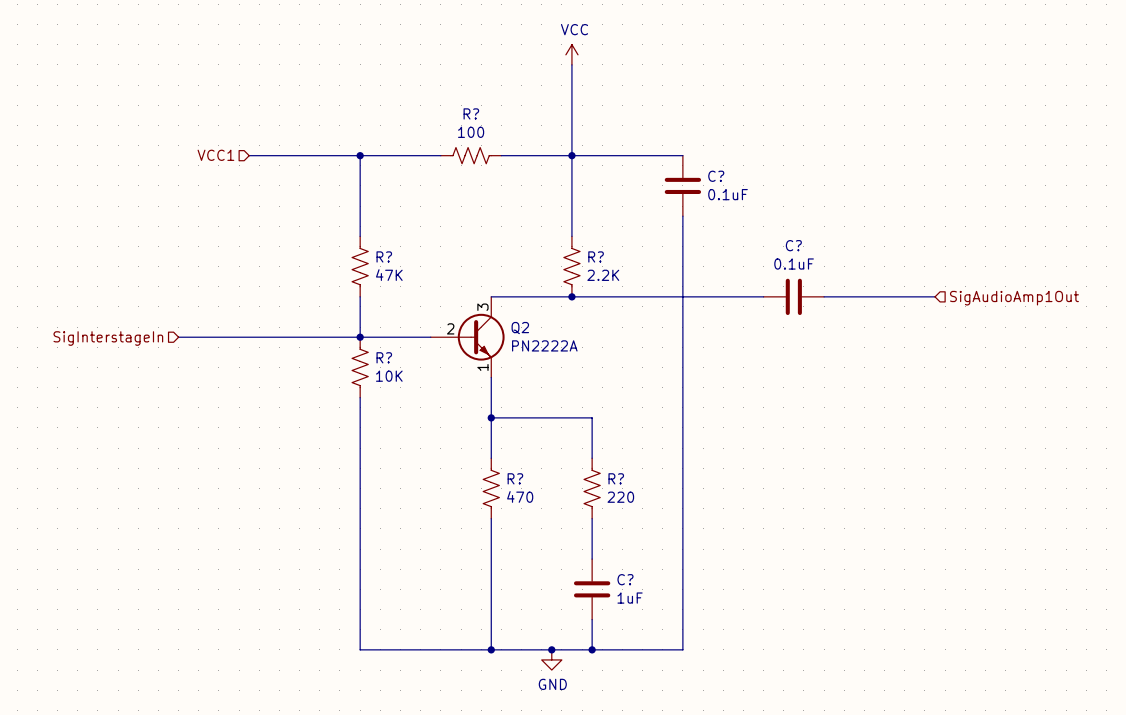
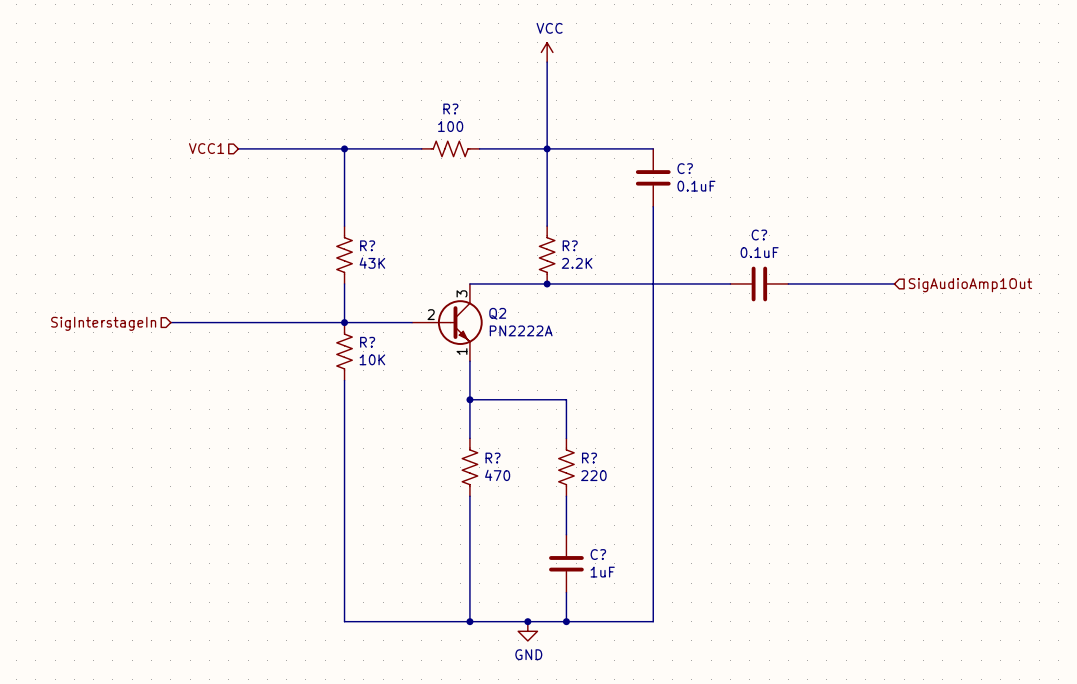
R? value: 47K (389, 275) -> 43K (372, 263)

